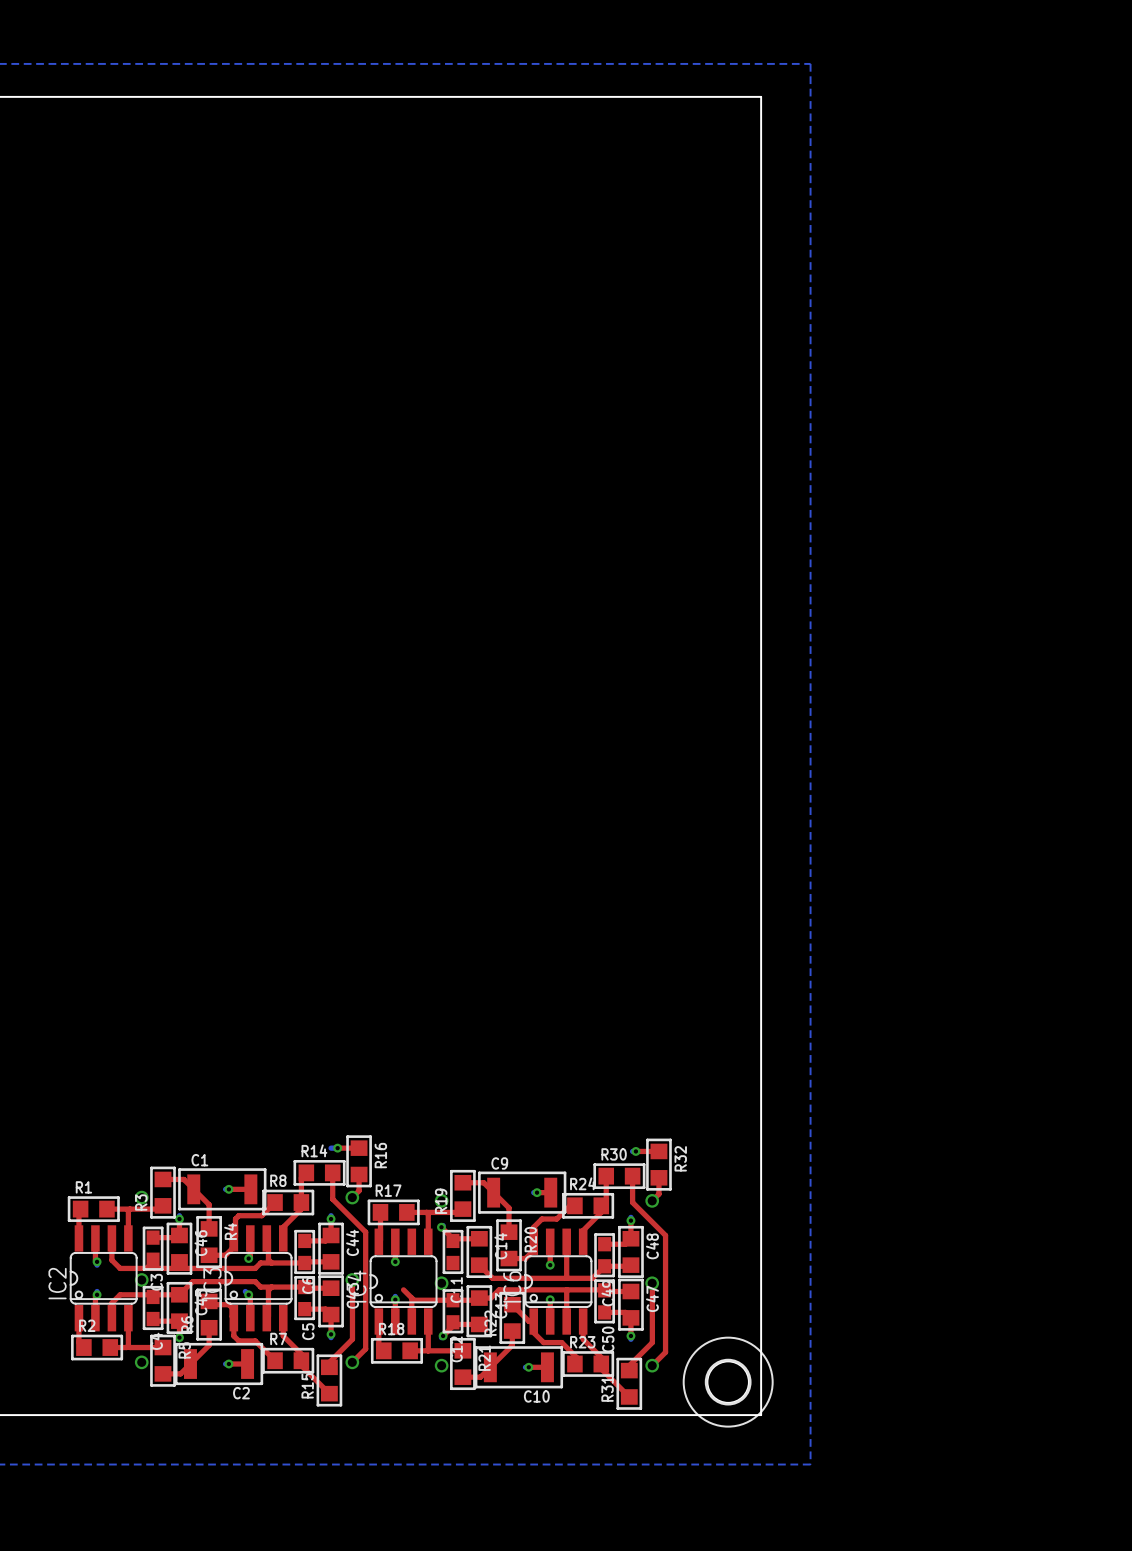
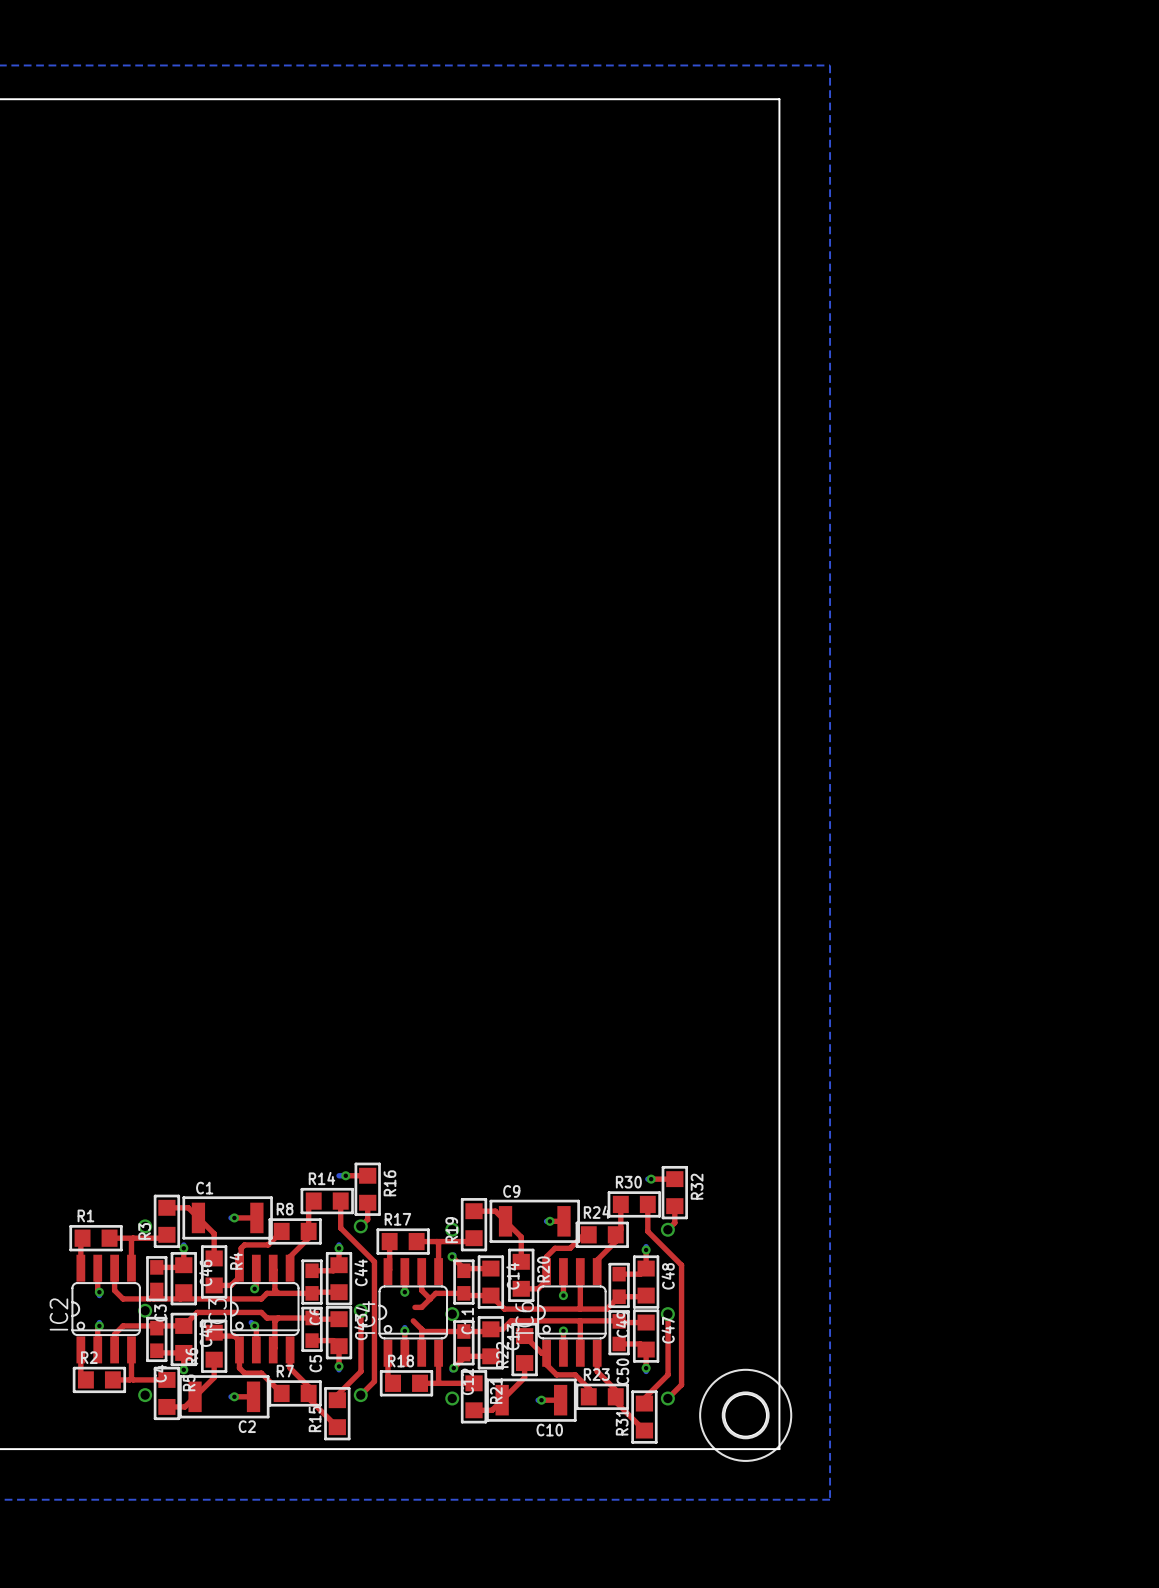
top track: none -> (421, 1271) (421, 1290) (430, 1298)
top track: none -> (490, 1295) (435, 1293) (421, 1307) (414, 1307)

